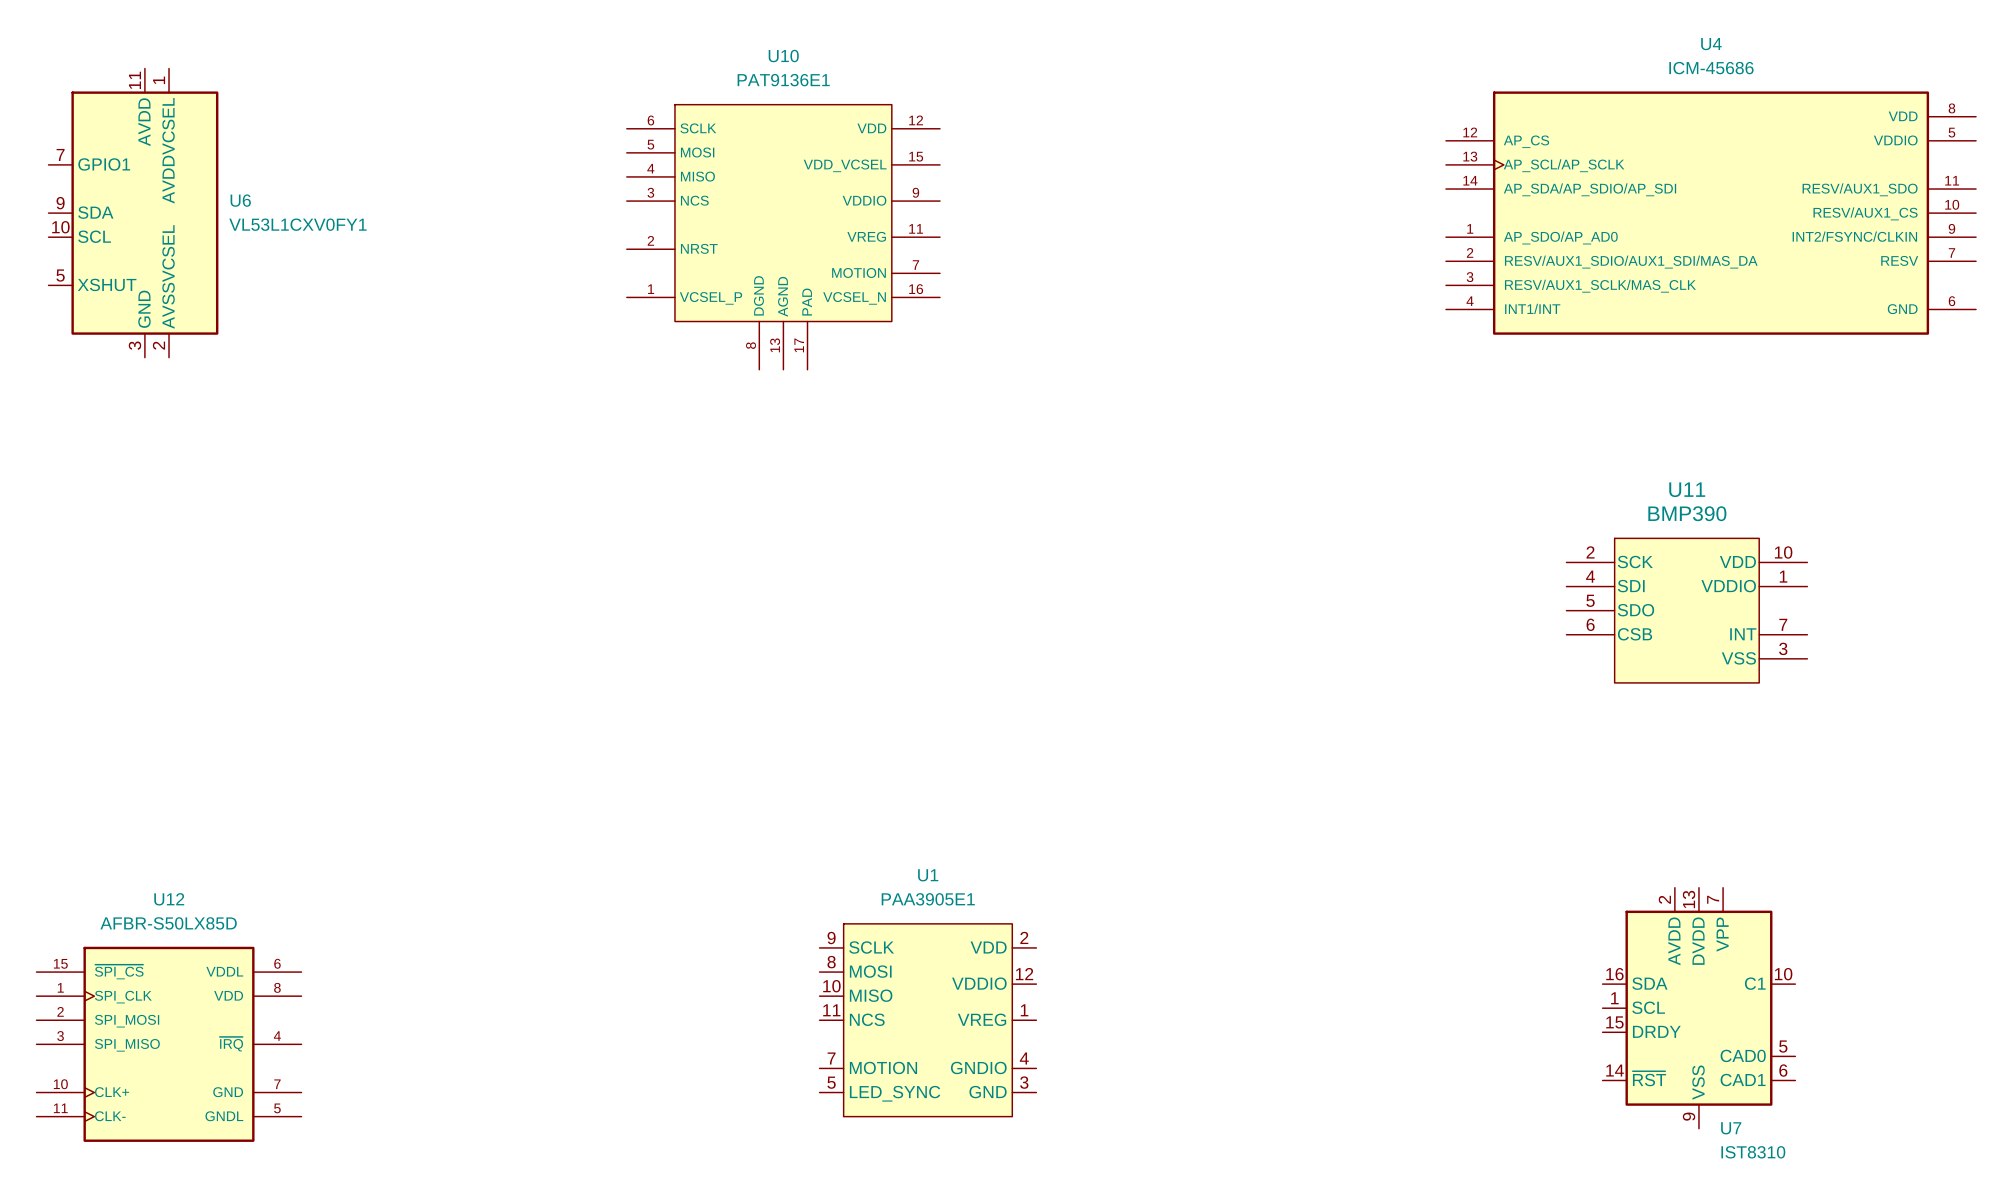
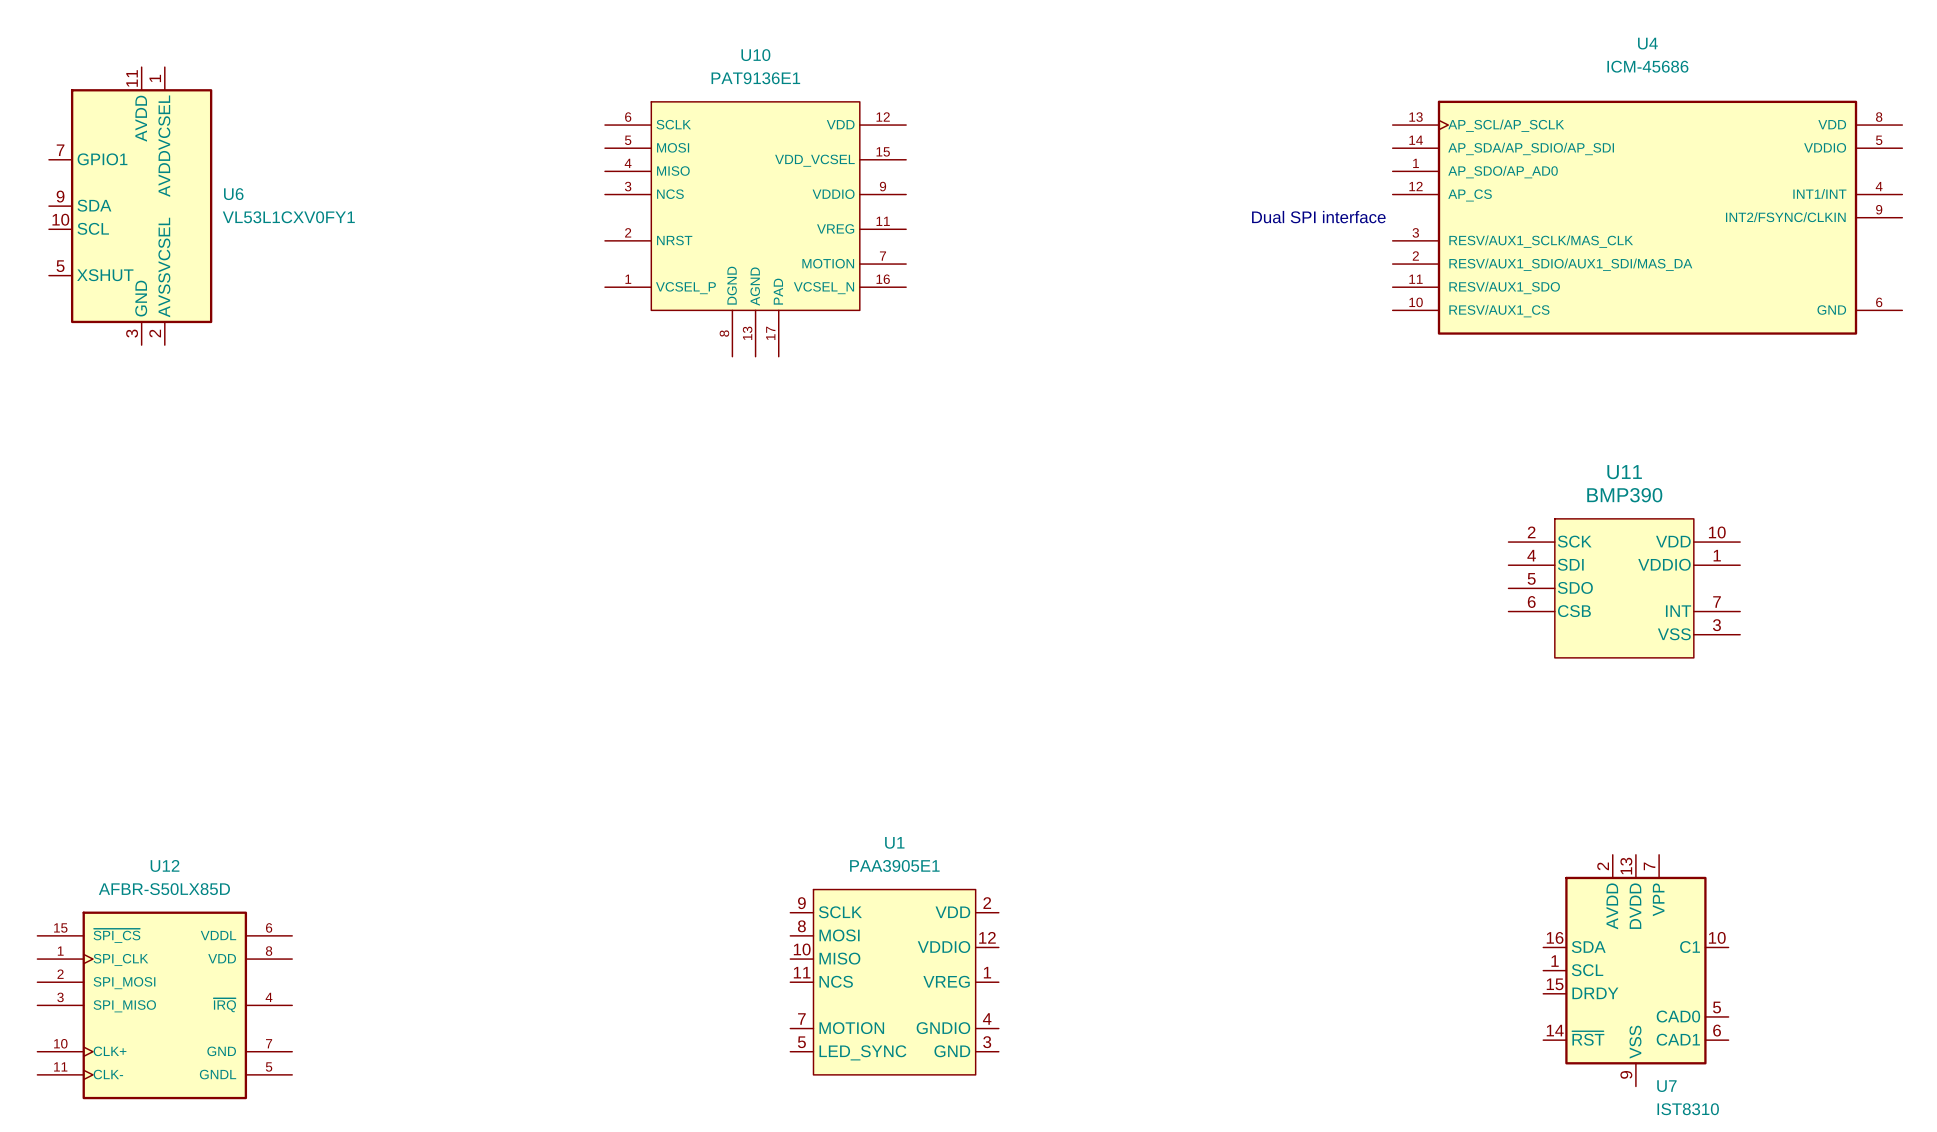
U4 symbol: [1445, 91, 1977, 335] -> [1392, 100, 1903, 335]
text: none -> Dual SPI interface (1318, 217)

